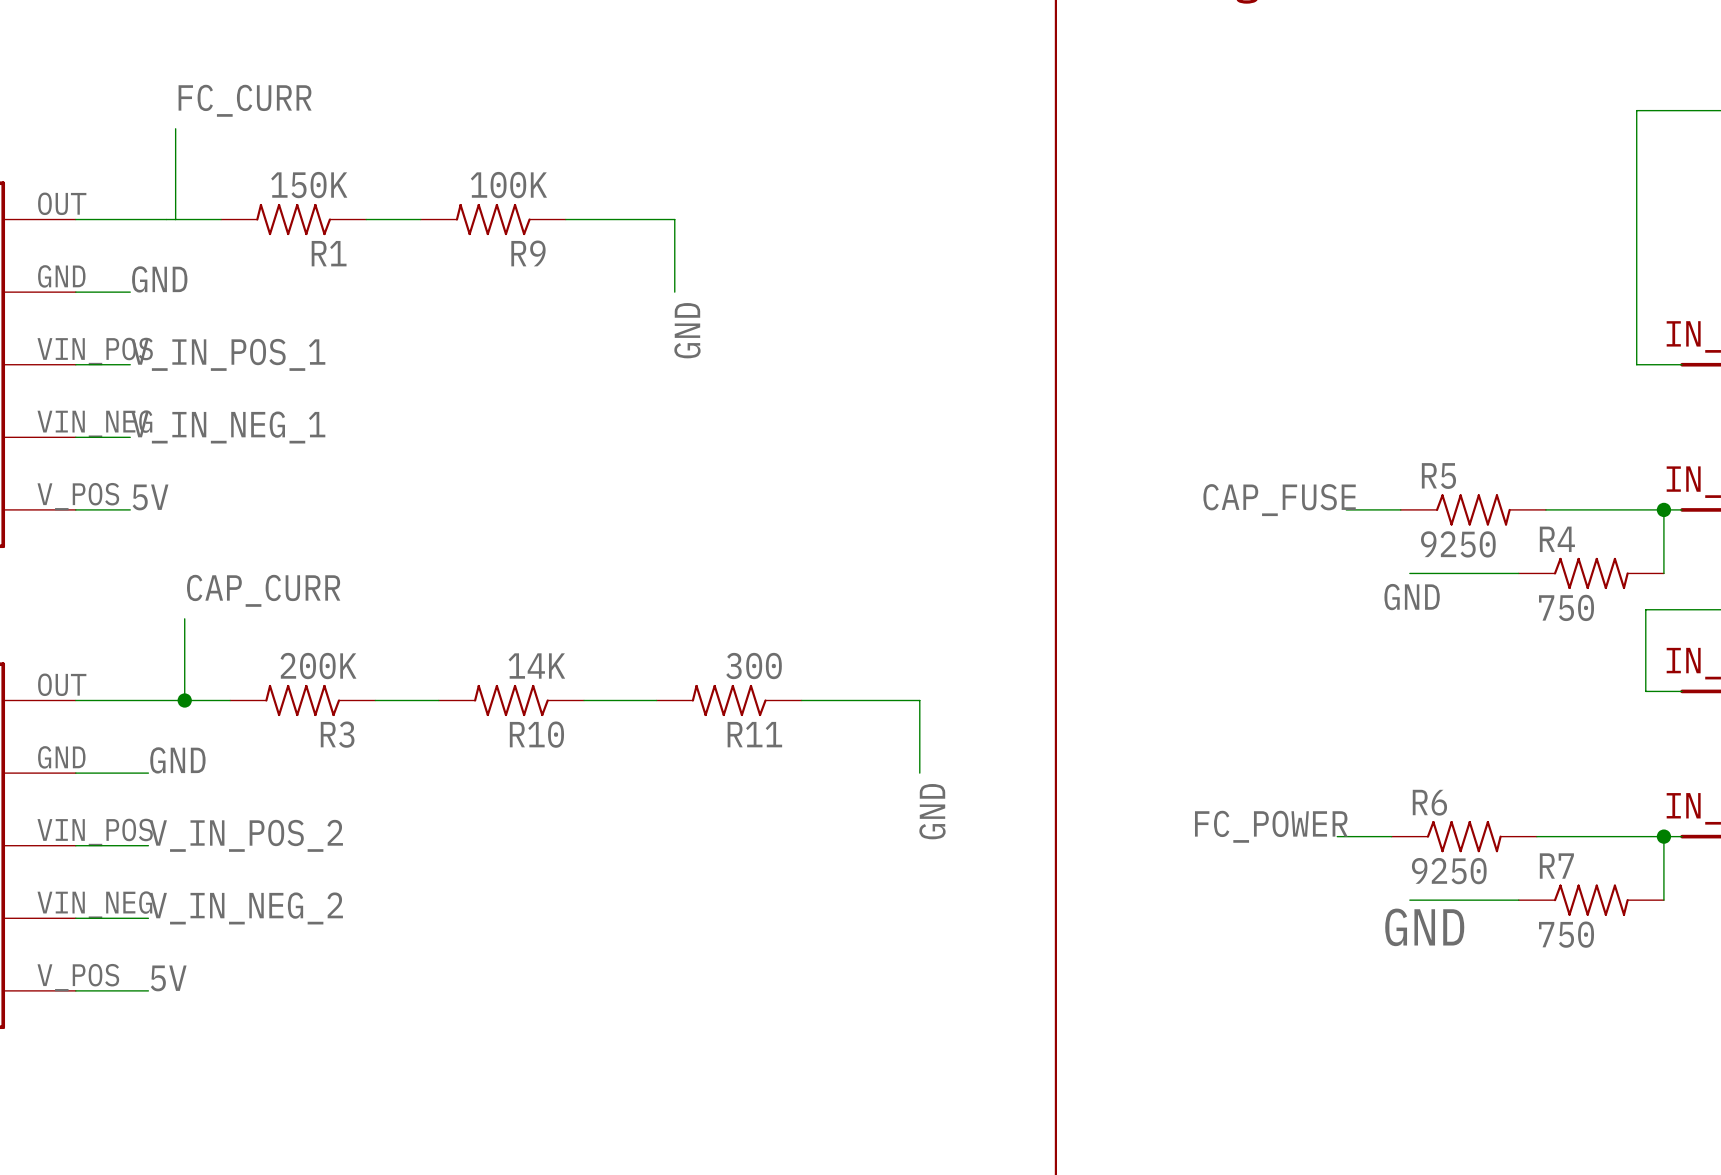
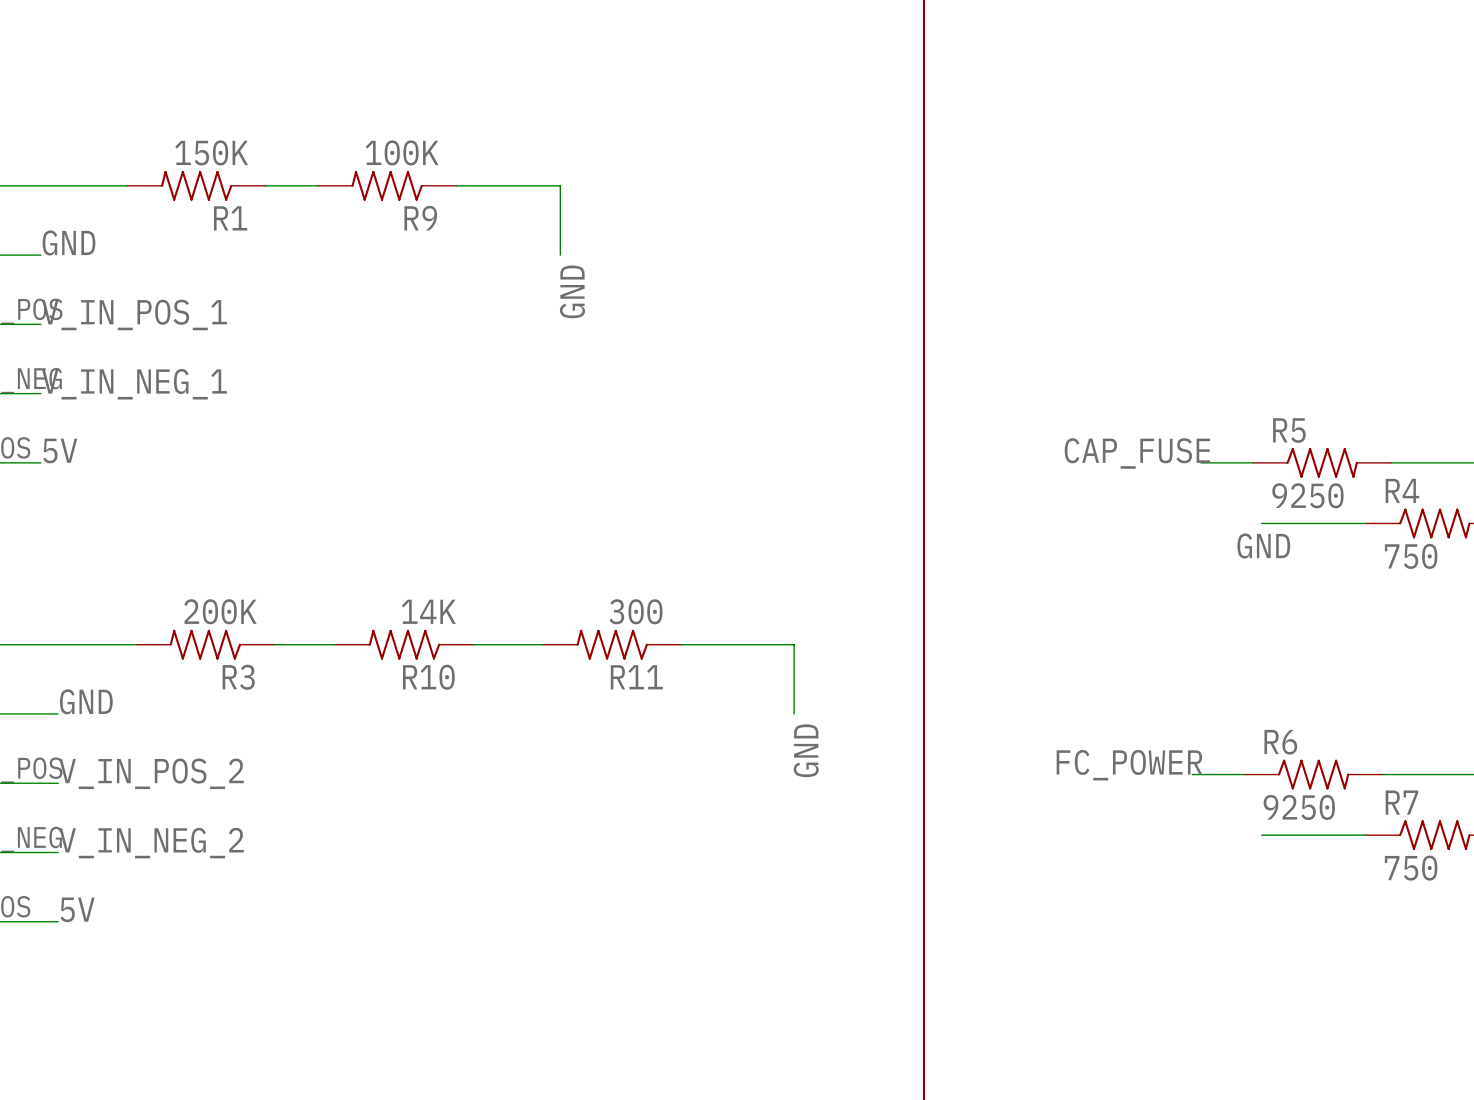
label: FC_CURR (245, 100) -> none
wire: (175, 128) (175, 219) -> none
label: CAP_CURR (263, 590) -> none
wire: (184, 618) (184, 700) -> none
junction: (184, 700) -> none
label: GND (1424, 927) -> none

